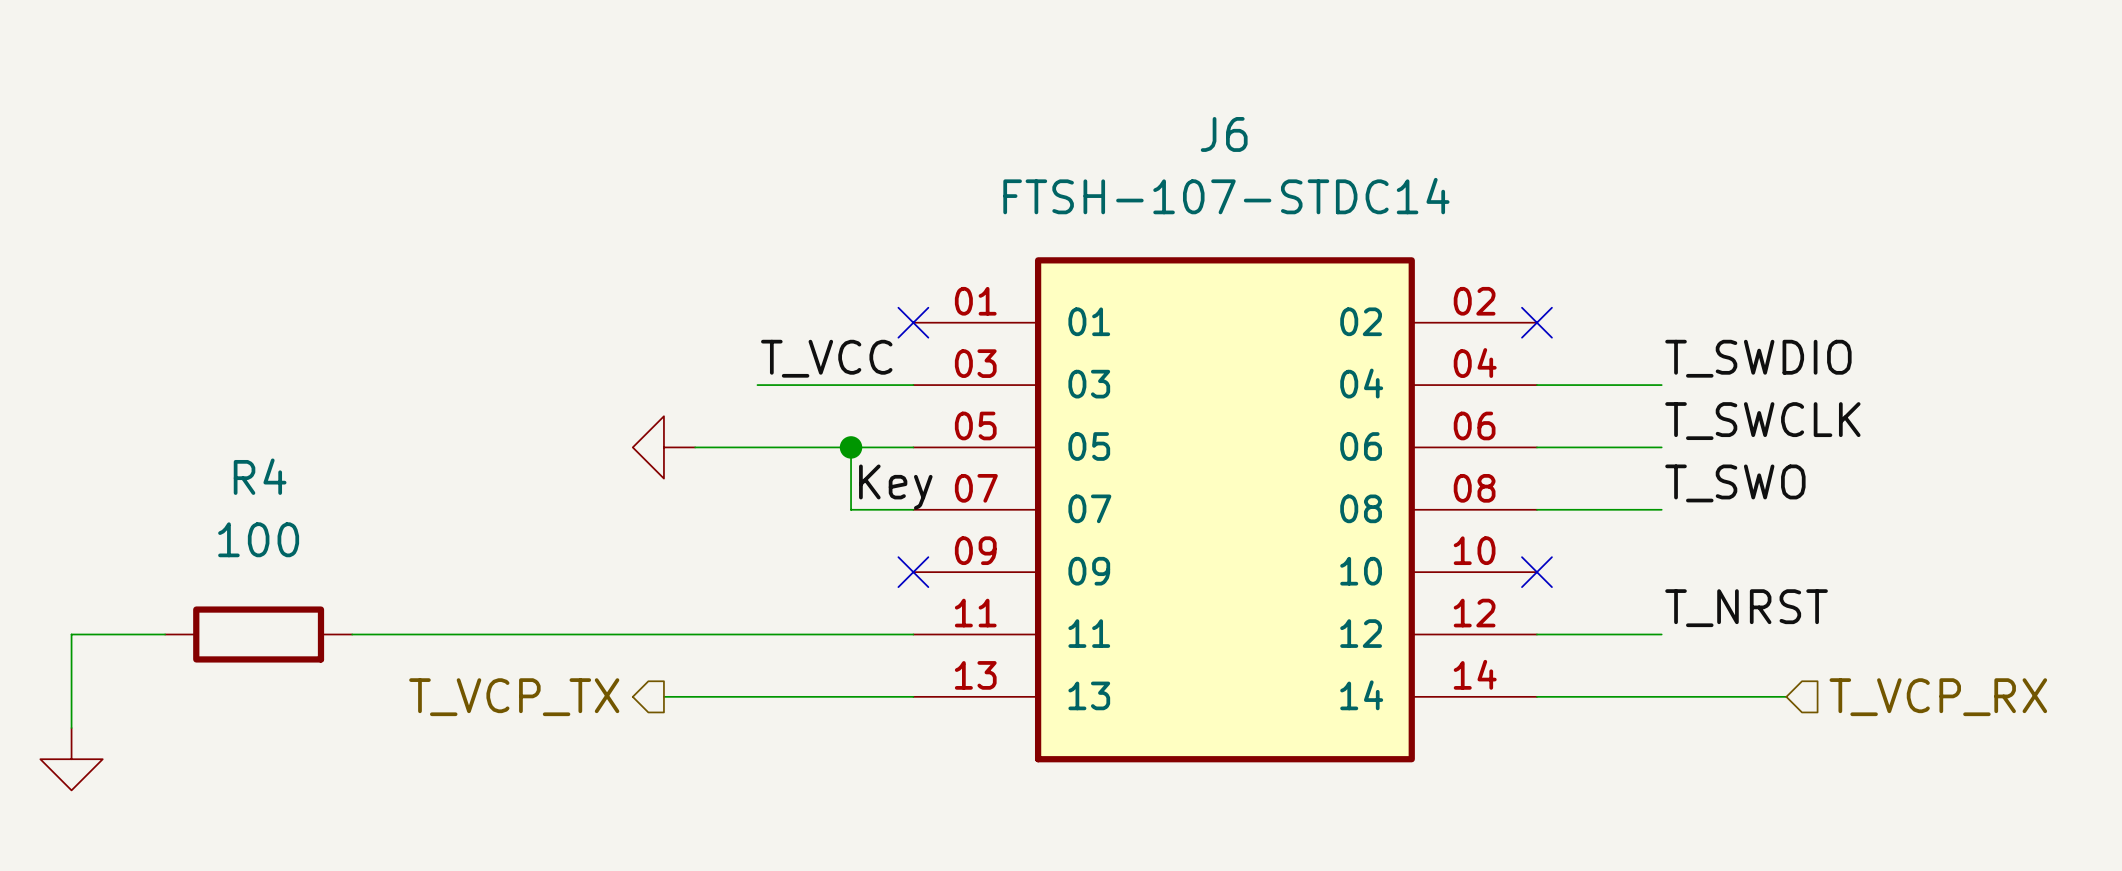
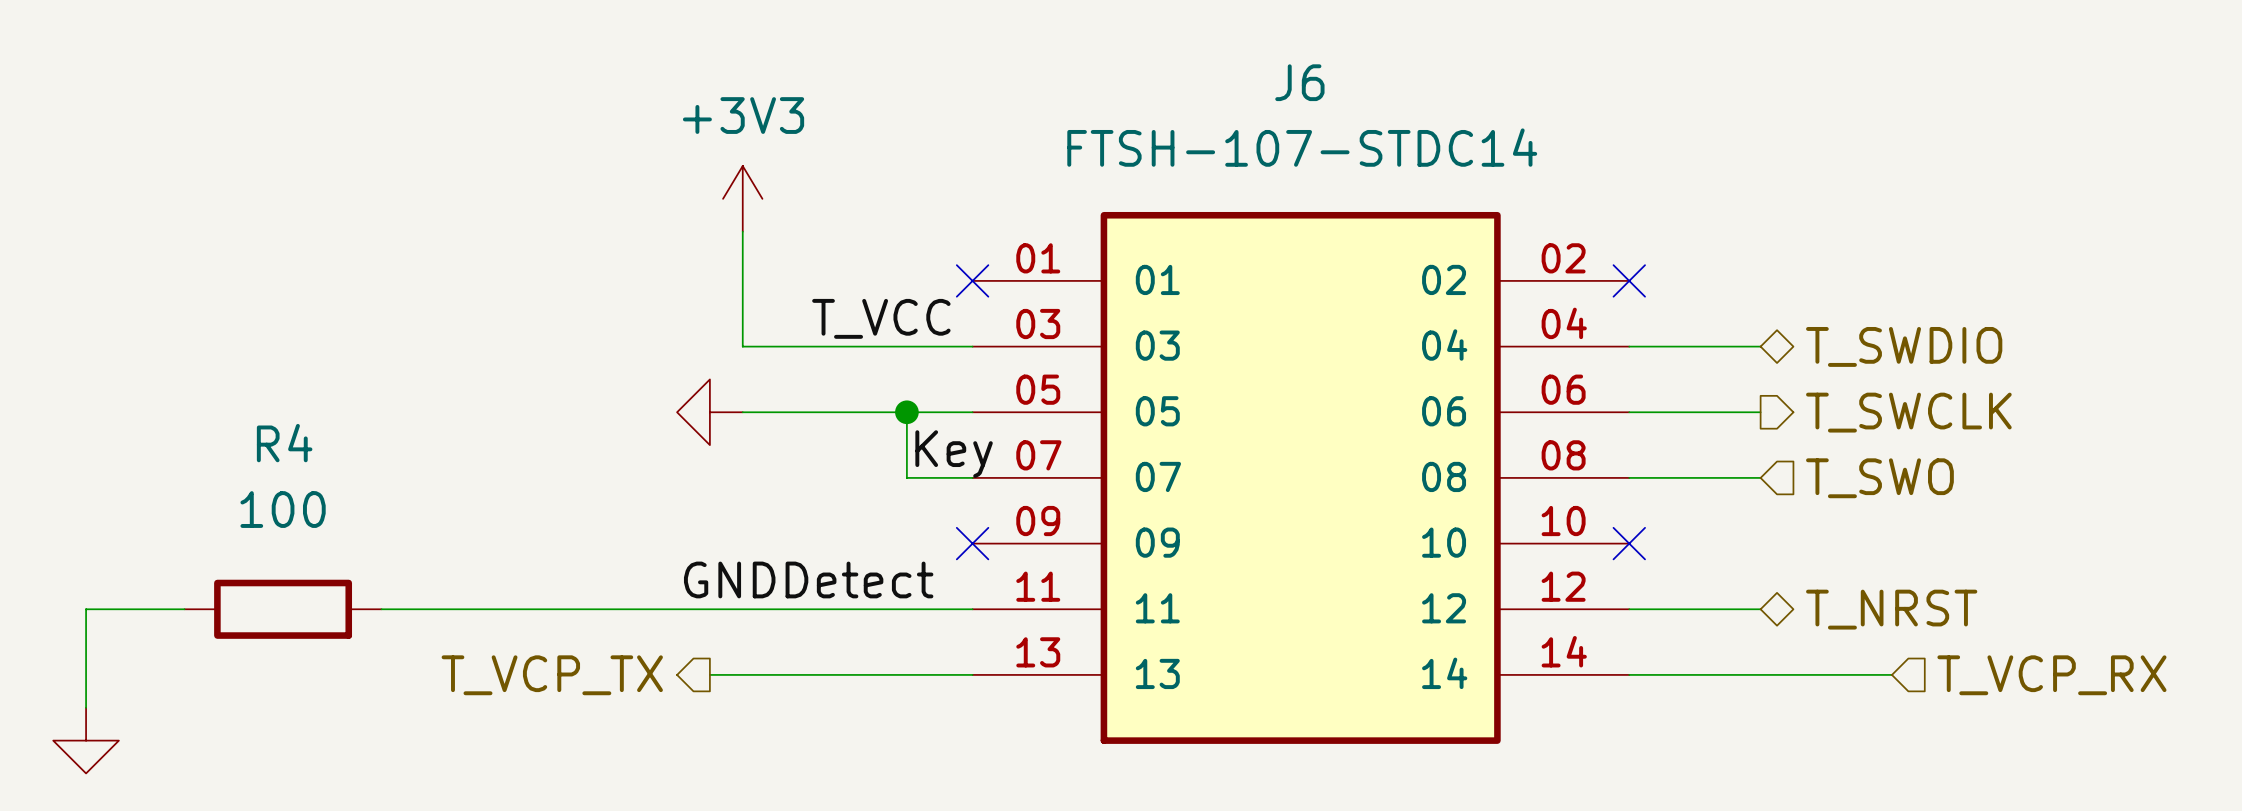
power symbol: none -> +3V3 (742, 198)
wire: none -> (742, 231) (742, 346) (808, 346)
label: T_SWDIO (1758, 358) -> none
hierarchical label: none -> T_SWDIO (1904, 346)
label: T_SWCLK (1762, 421) -> none
hierarchical label: none -> T_SWCLK (1908, 412)
label: T_SWO (1735, 483) -> none
hierarchical label: none -> T_SWO (1879, 478)
label: none -> GNDDetect (808, 579)
label: T_NRST (1746, 608) -> none
hierarchical label: none -> T_NRST (1891, 609)

